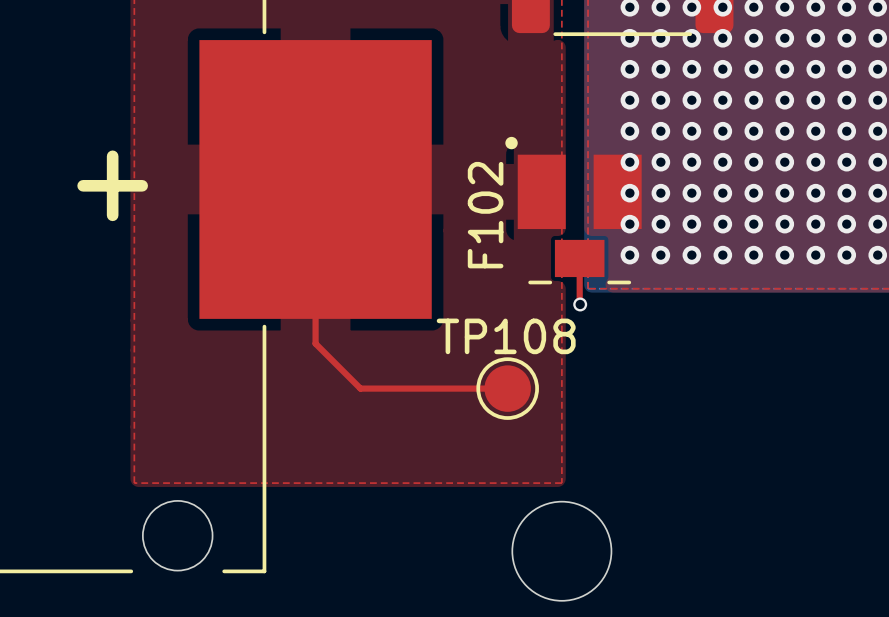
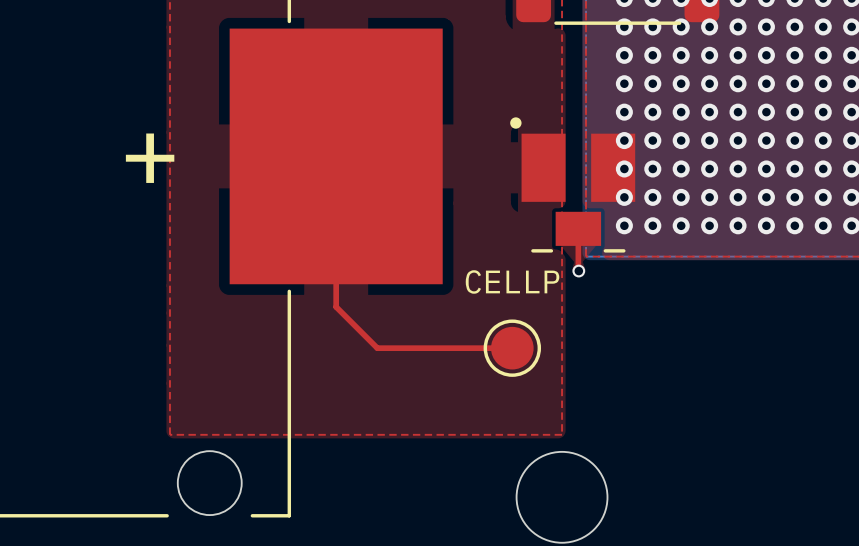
F102 name: F102 (485, 215) -> none
text: none -> CELLP (512, 281)
TP108 name: TP108 (506, 336) -> none

